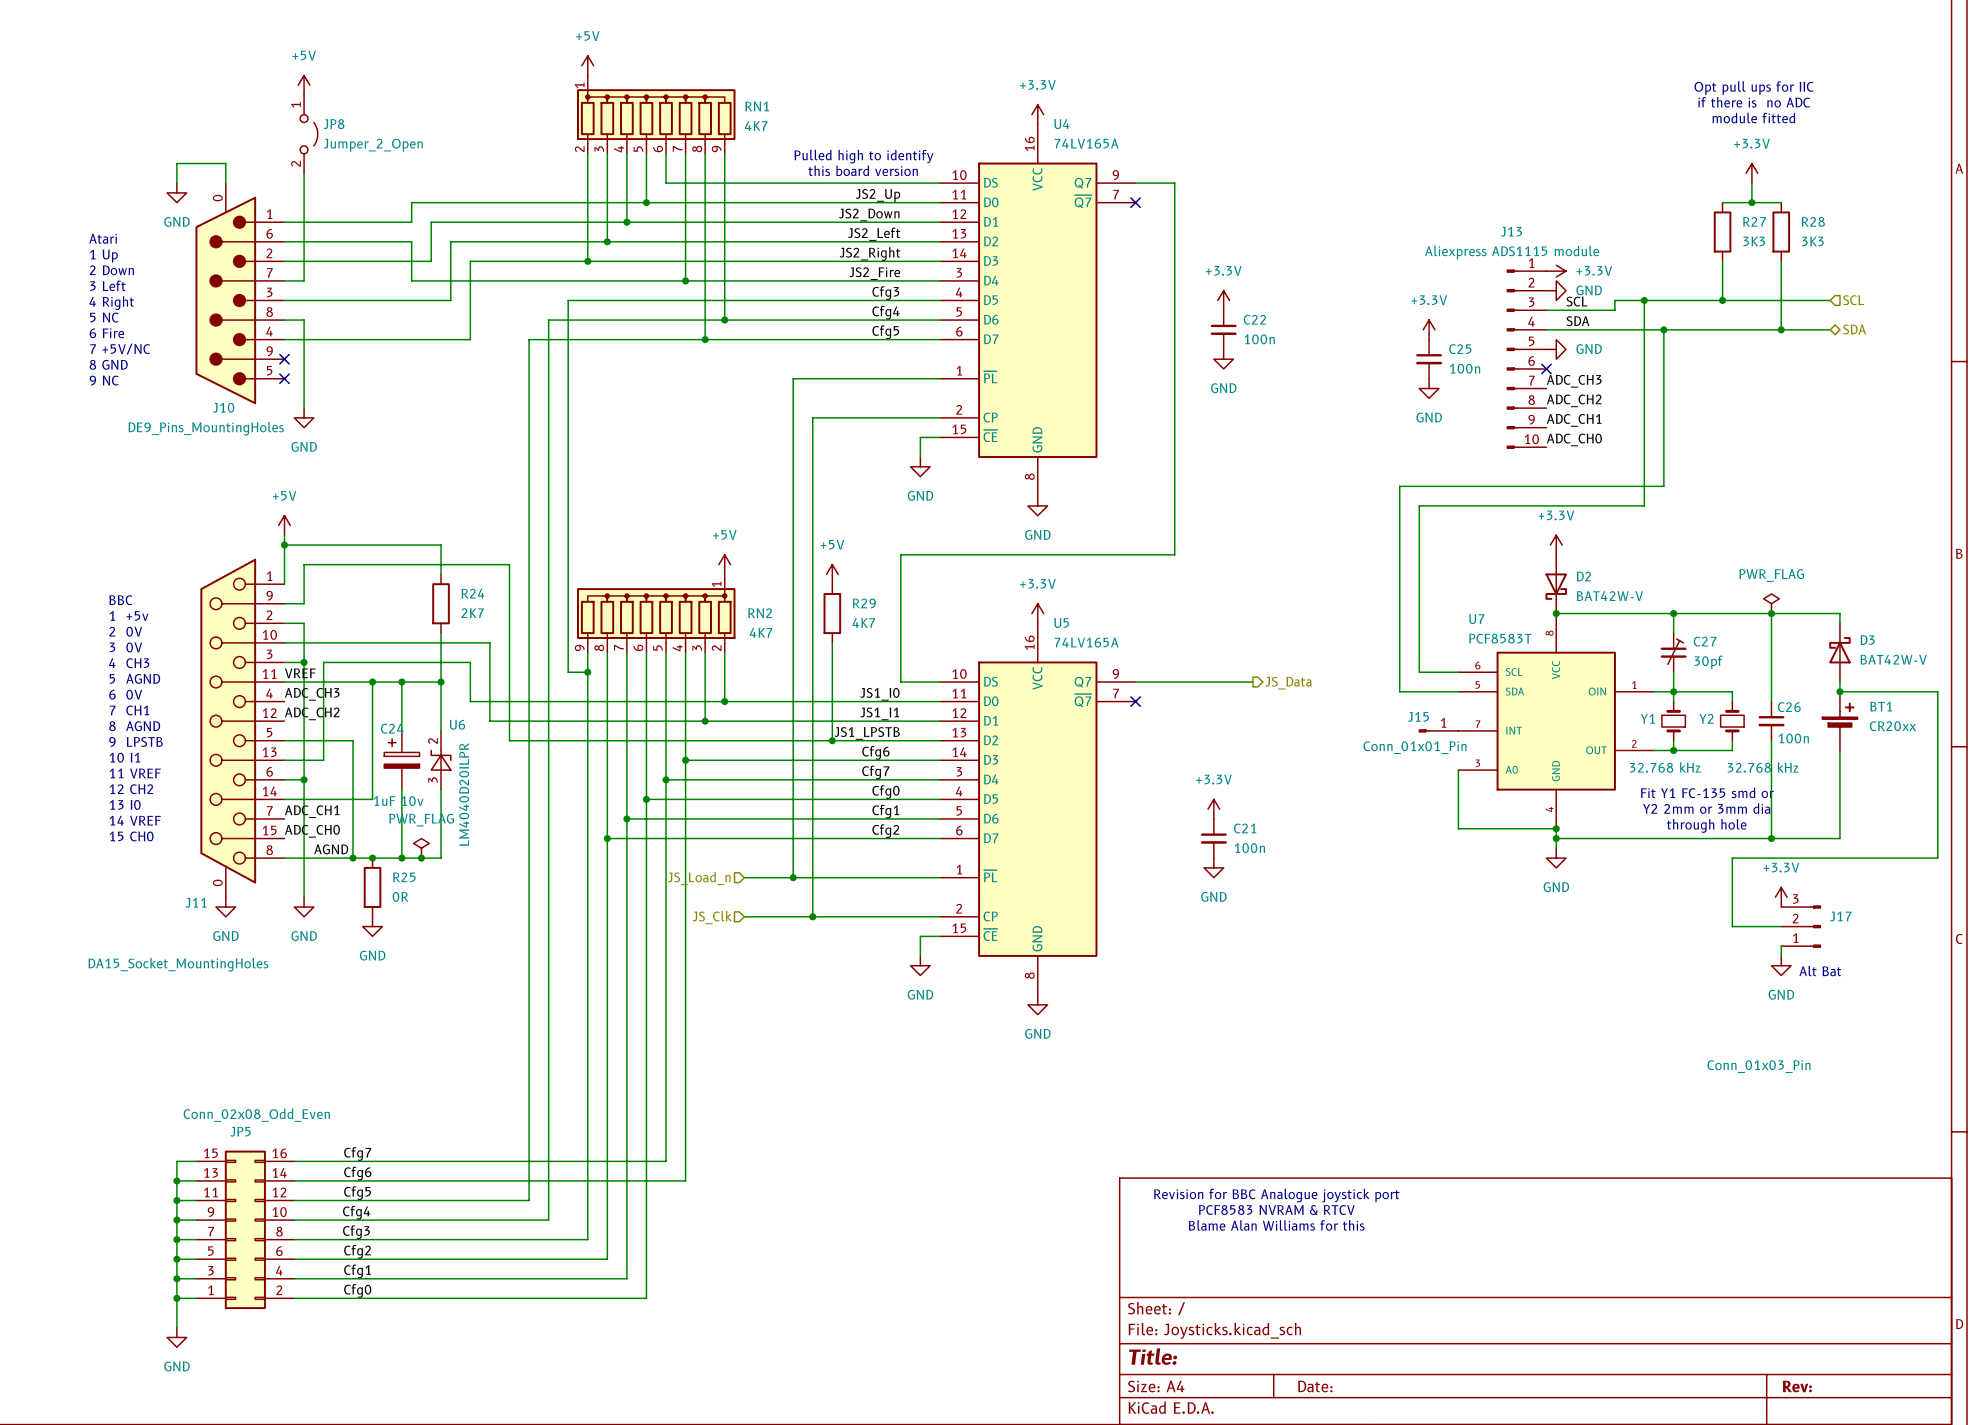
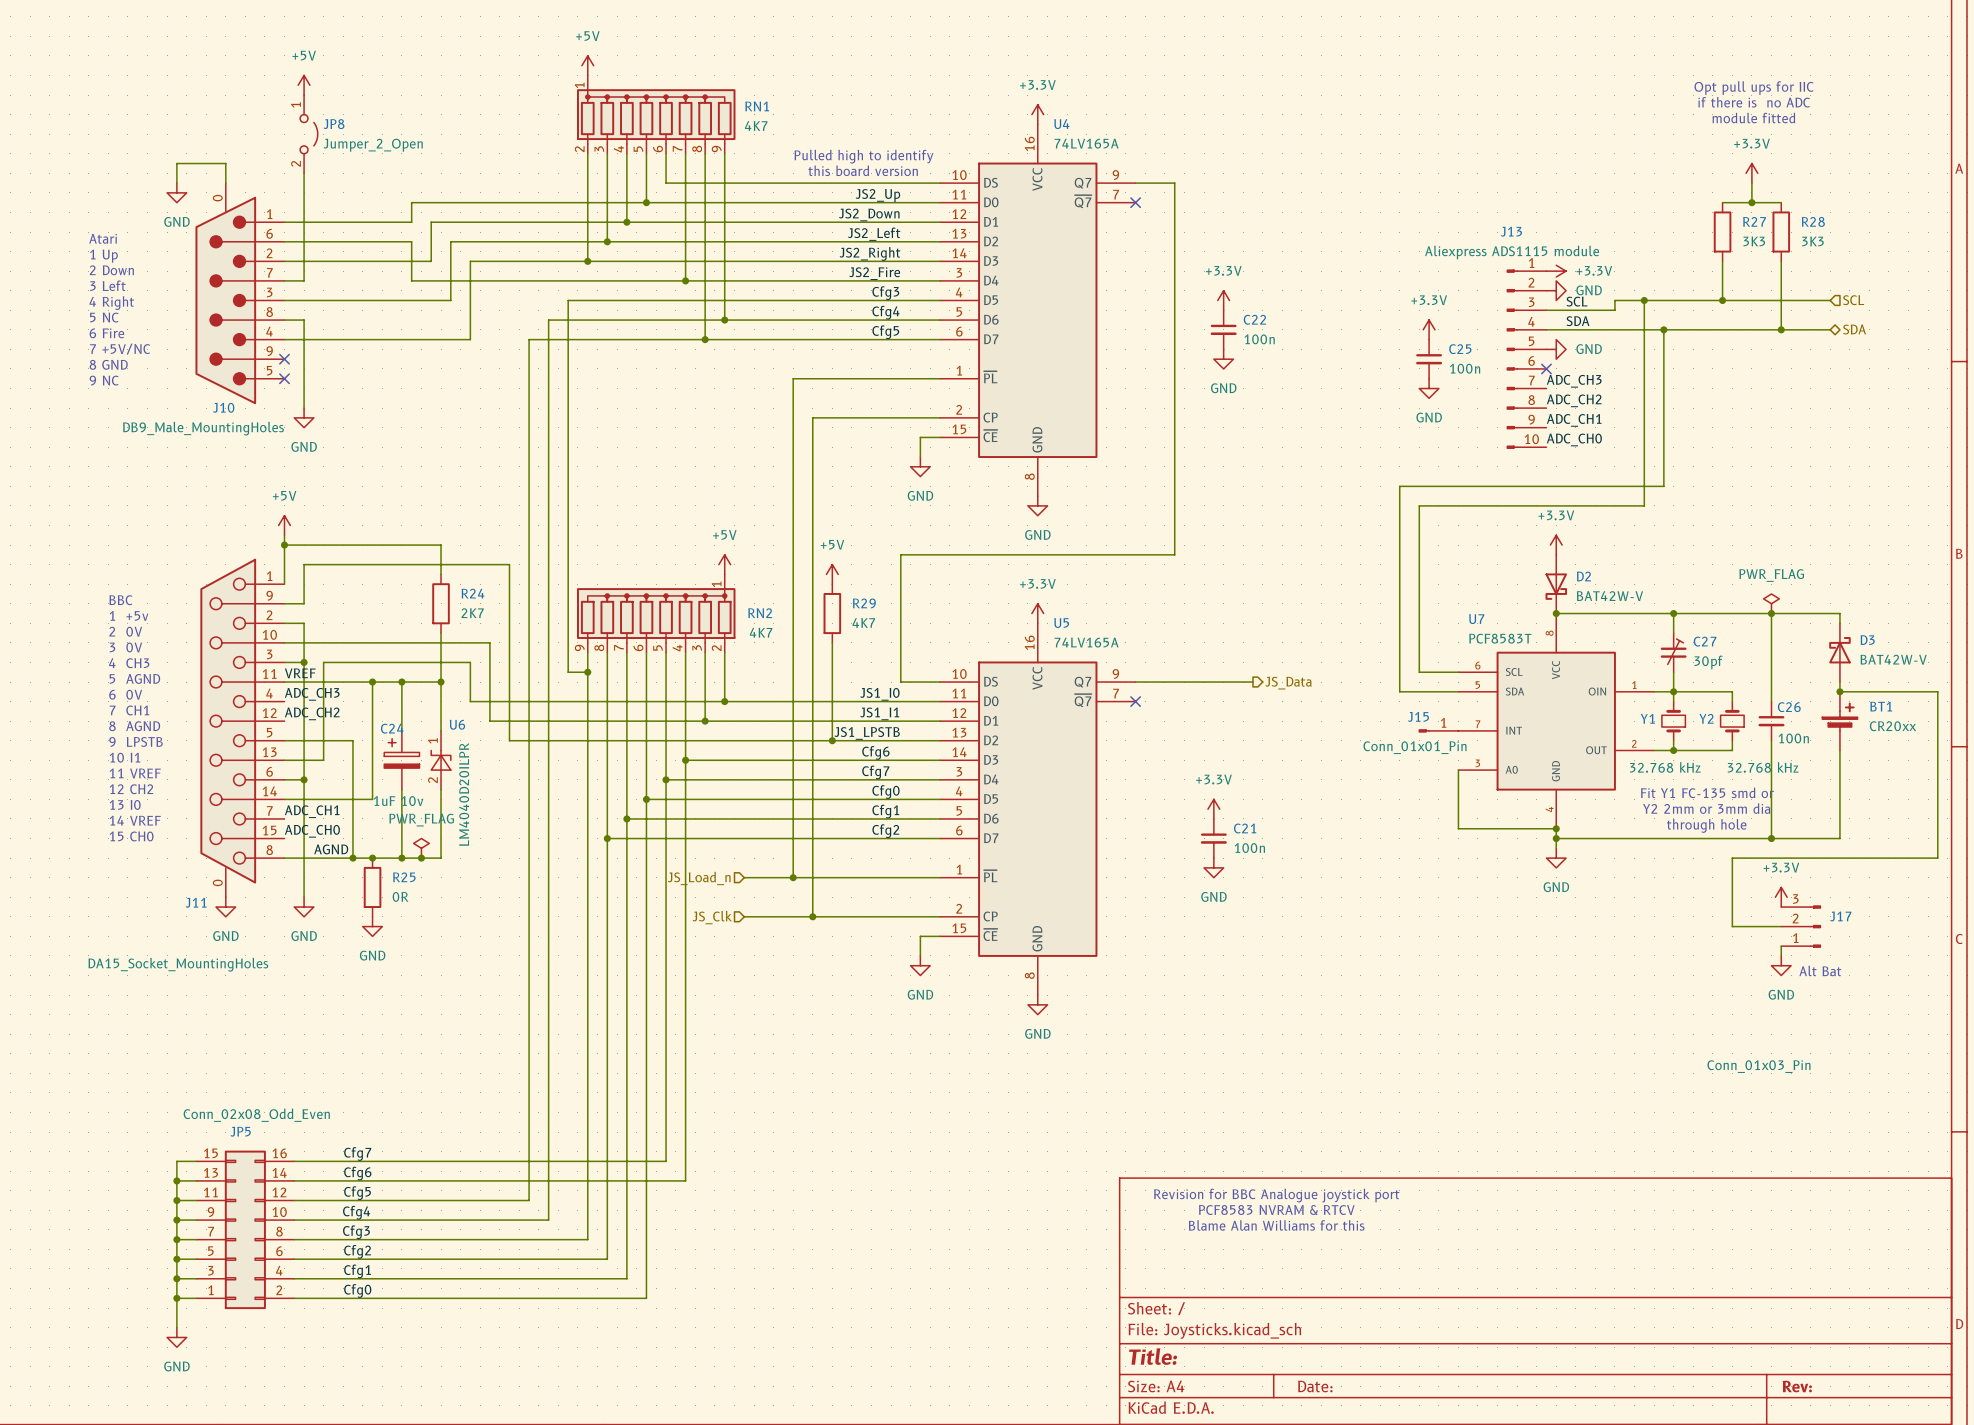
J10 value: DE9_Pins_MountingHoles (206, 428) -> DB9_Male_MountingHoles (203, 428)
U6 pin number: 2 (432, 741) -> 1 (432, 740)
U6 pin number: 3 (433, 779) -> 2 (432, 780)

